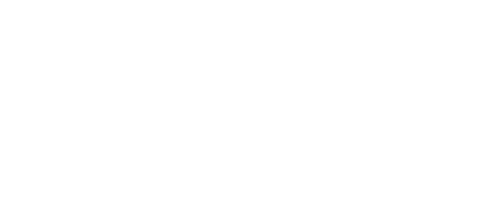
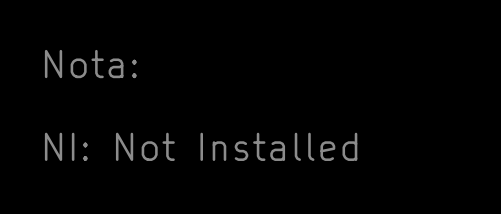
text: none -> Nota: (90, 64)
text: none -> NI: Not Installed (201, 146)

